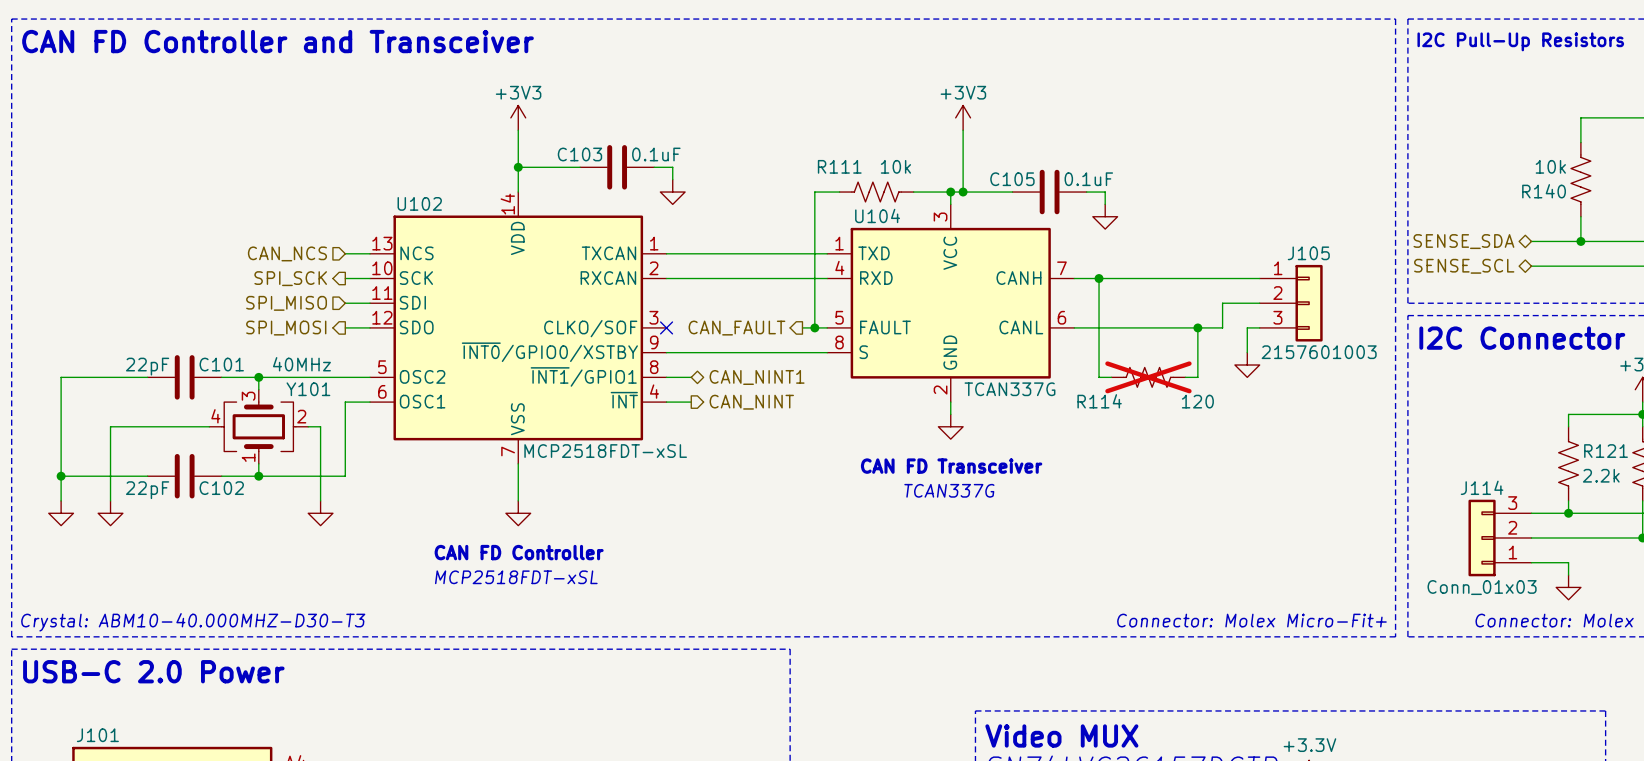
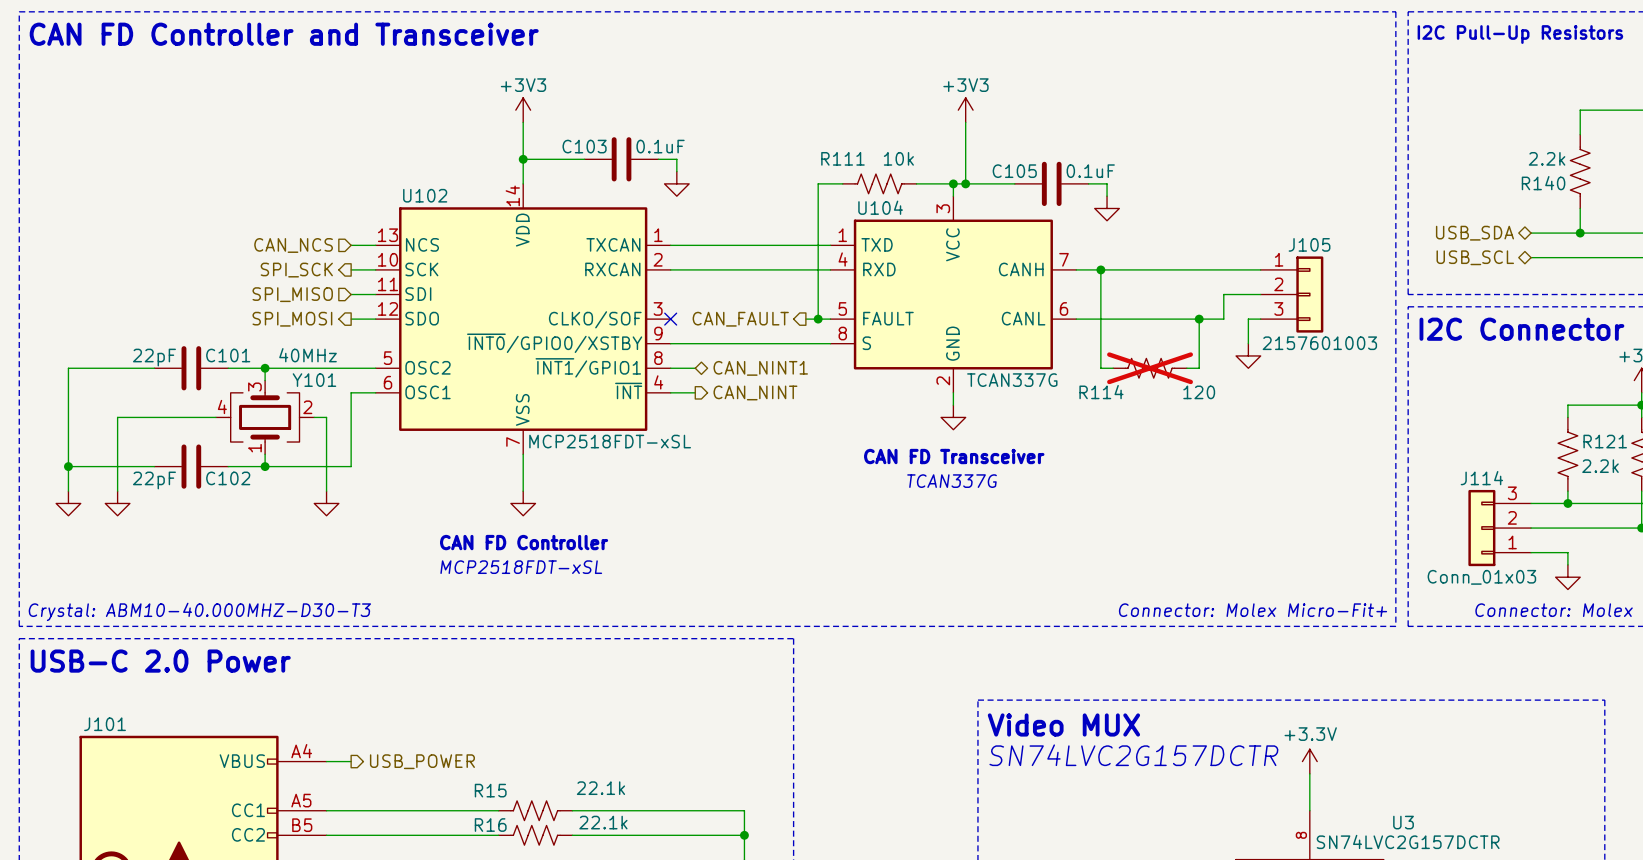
R140 value: 10k (1550, 166) -> 2.2k (1547, 158)
hierarchical label: SENSE_SDA (1463, 241) -> USB_SDA (1474, 233)
hierarchical label: SENSE_SCL (1464, 266) -> USB_SCL (1475, 257)

